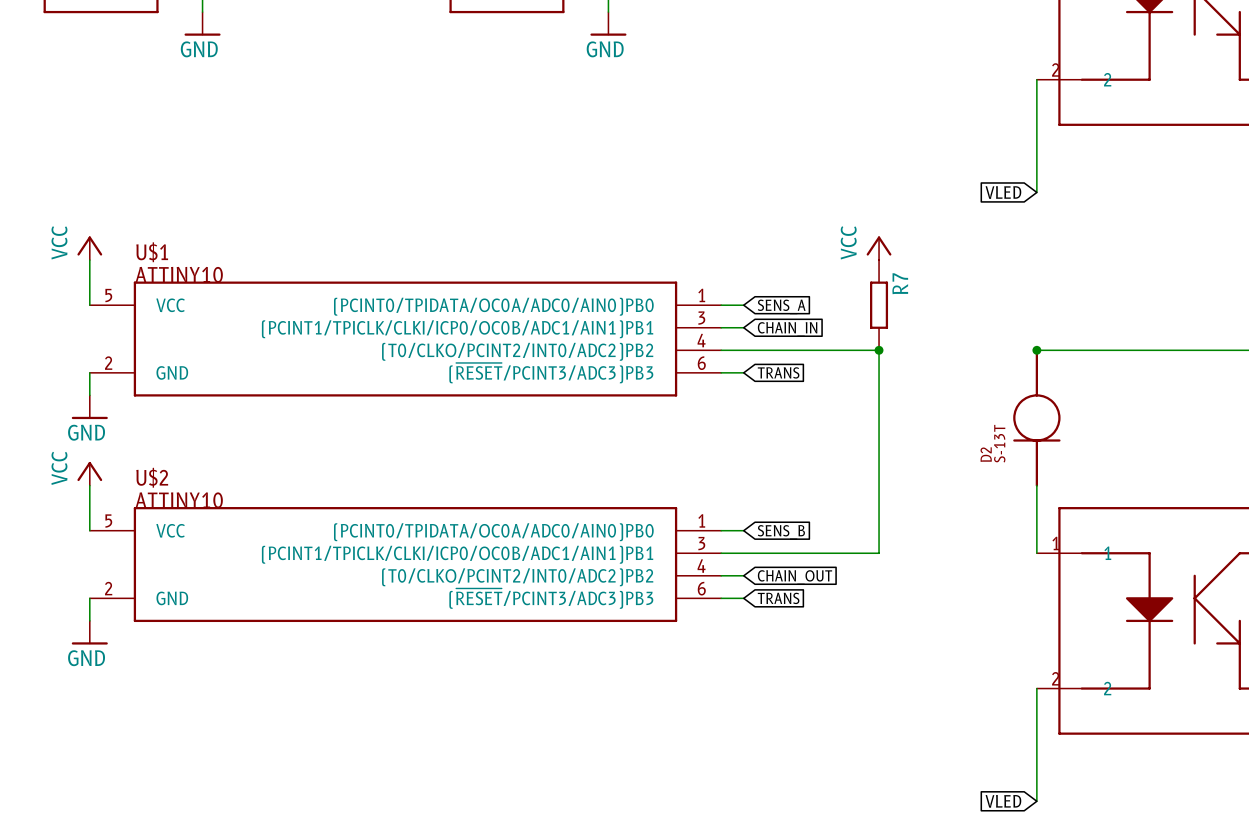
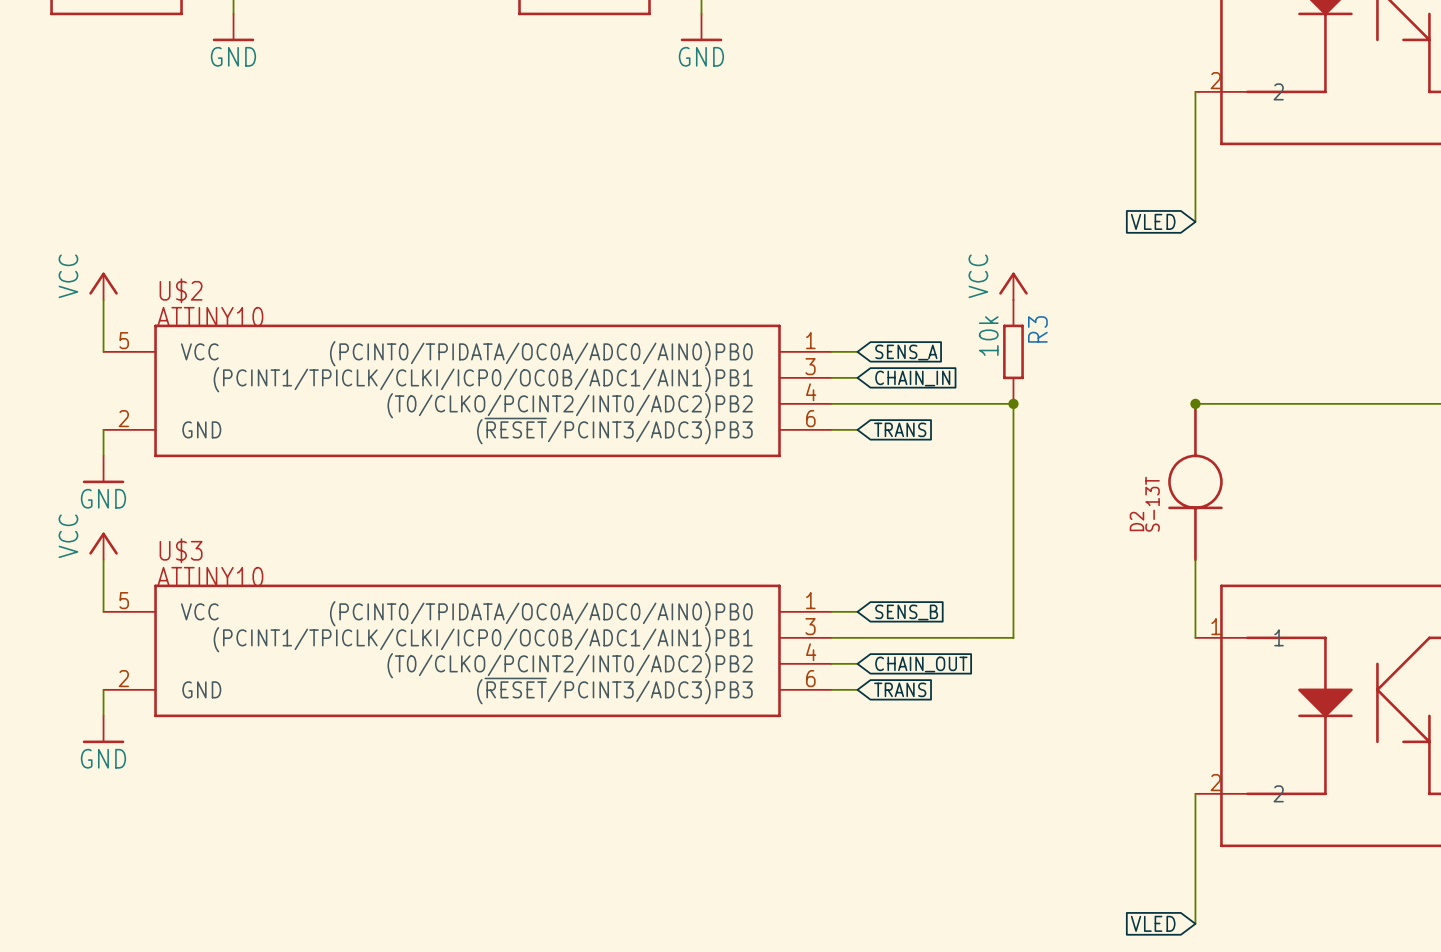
U$1 name: U$1 (152, 252) -> U$2 (181, 290)
R7 name: R7 (900, 283) -> R3 (1037, 329)
R7 value: none -> 10k (988, 336)
U$2 name: U$2 (152, 477) -> U$3 (181, 550)

